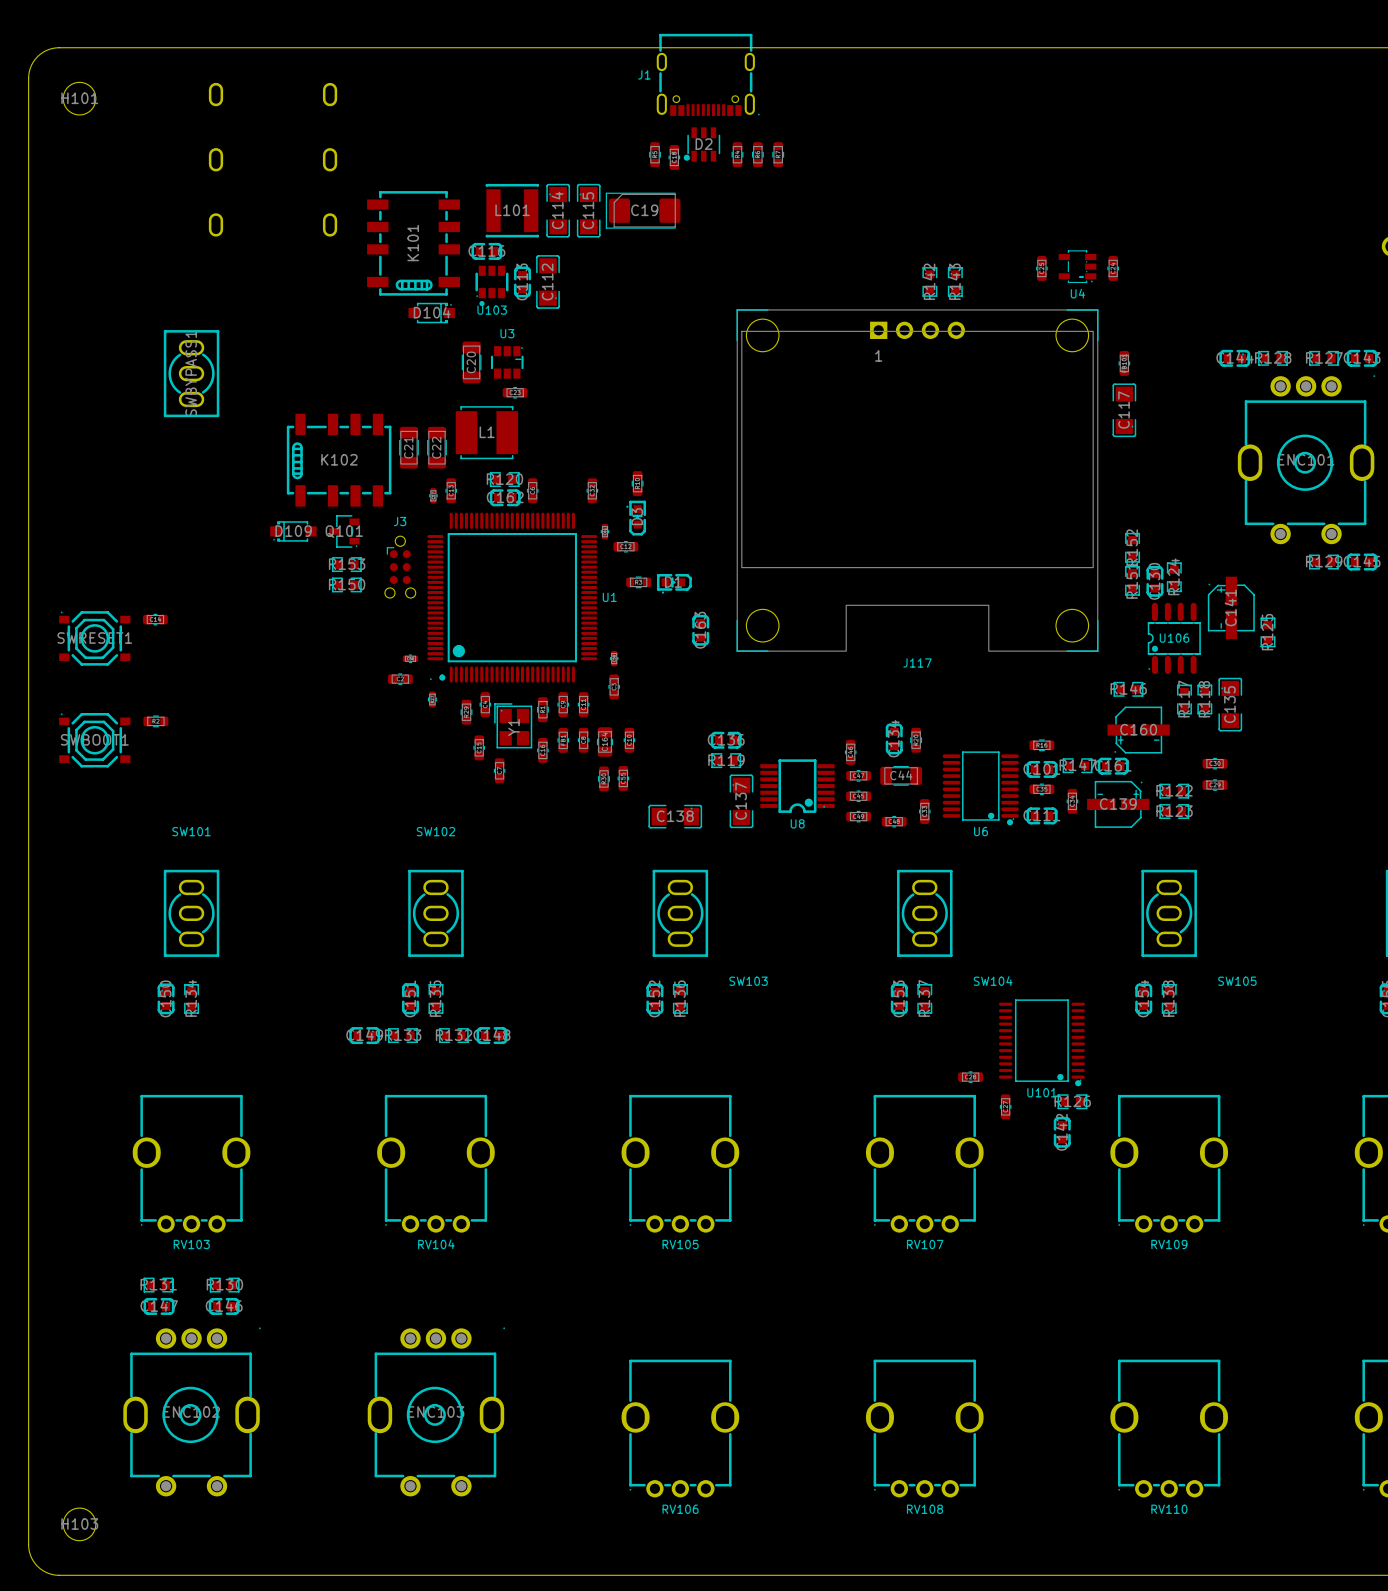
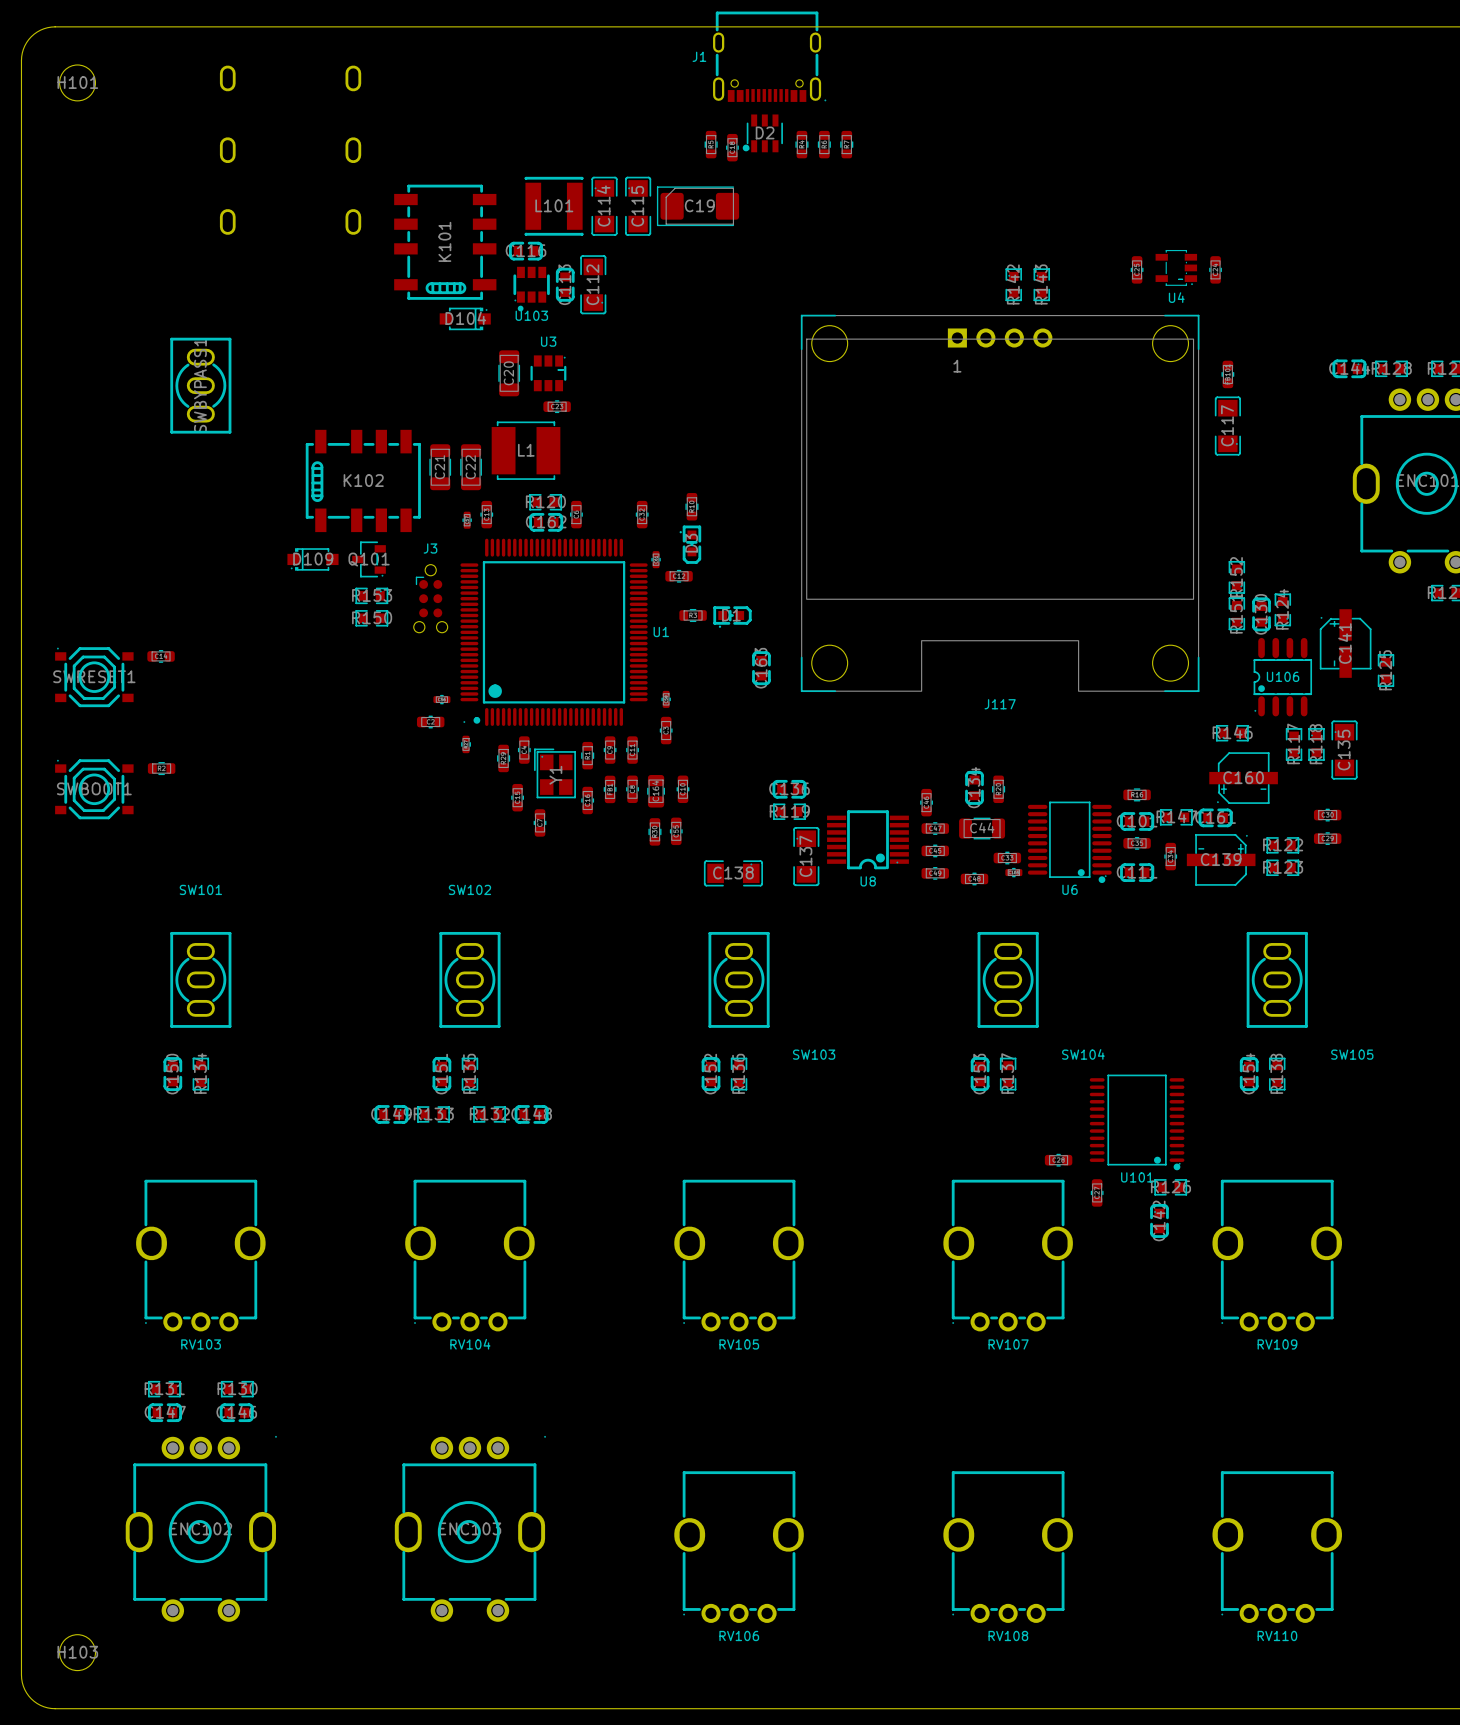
part rotation: 0° (924, 811) -> 90° clockwise (1007, 858)
part: none -> (1013, 872)

